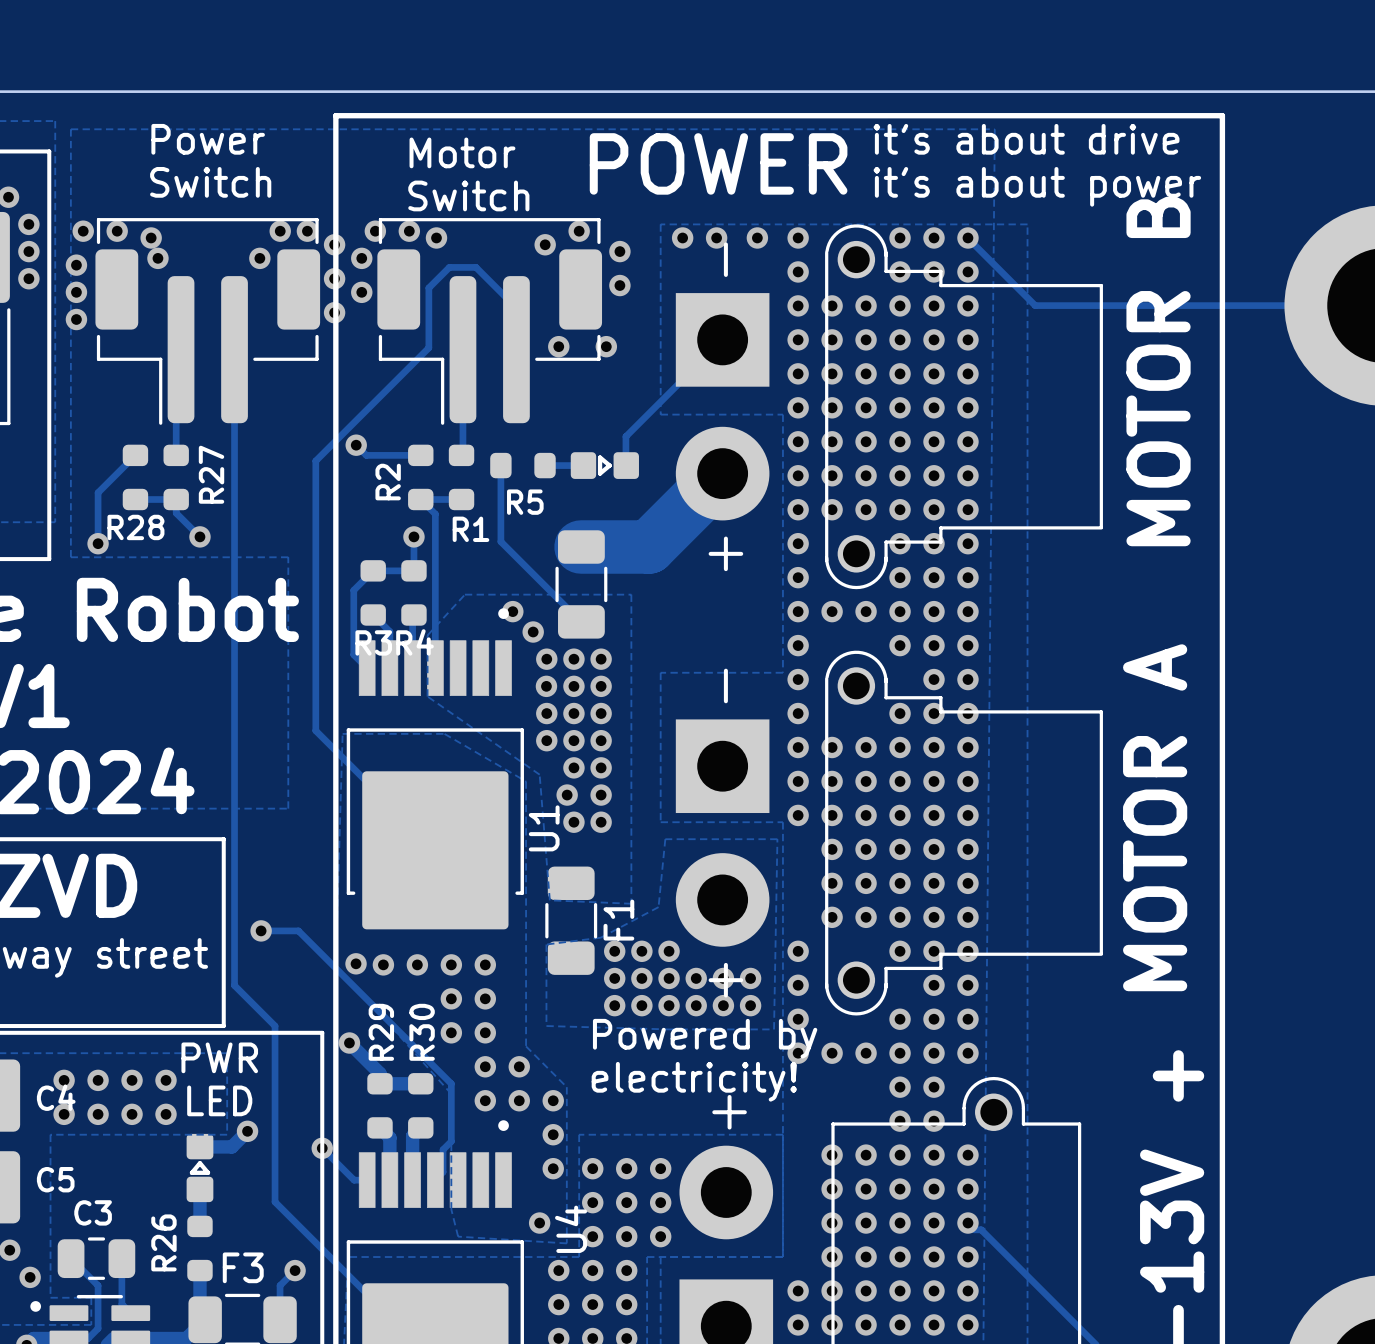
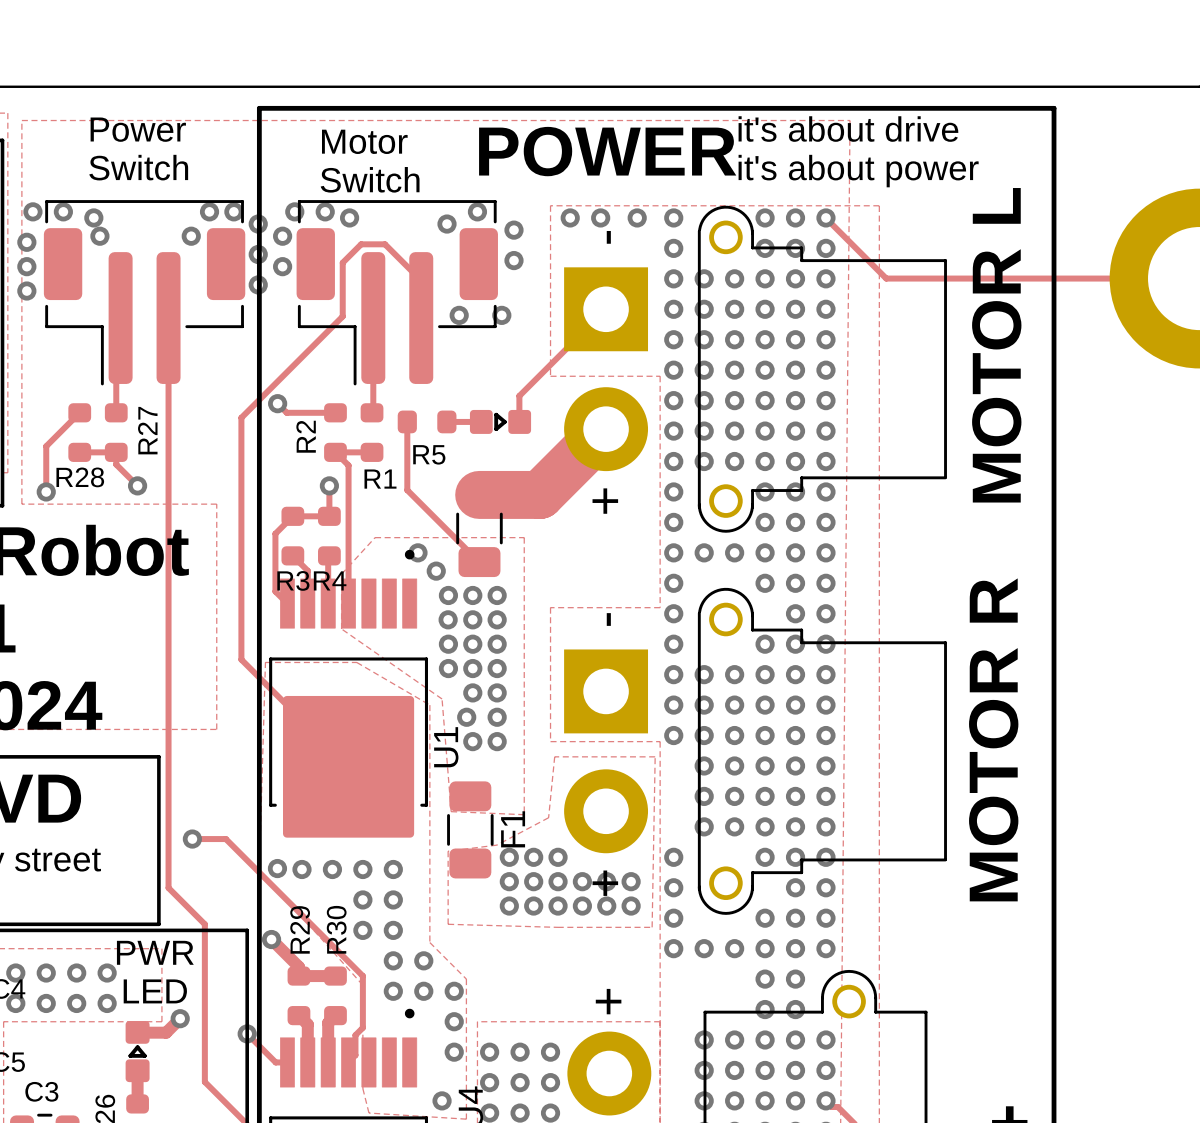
text: MOTOR B (1158, 371) -> MOTOR L (996, 345)
text: MOTOR A (1155, 817) -> MOTOR R (993, 739)
text: Powered by (705, 1038) -> none
text: electricity! (694, 1081) -> none

